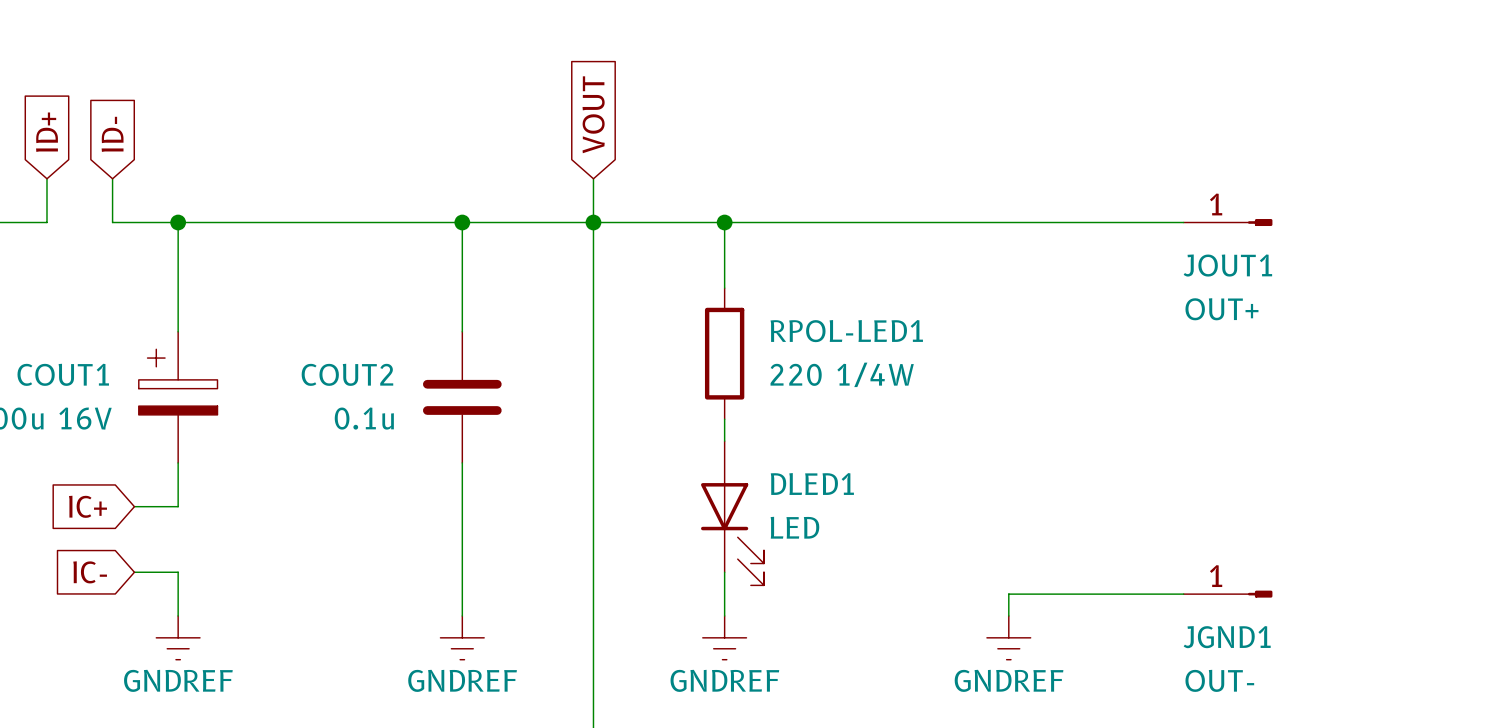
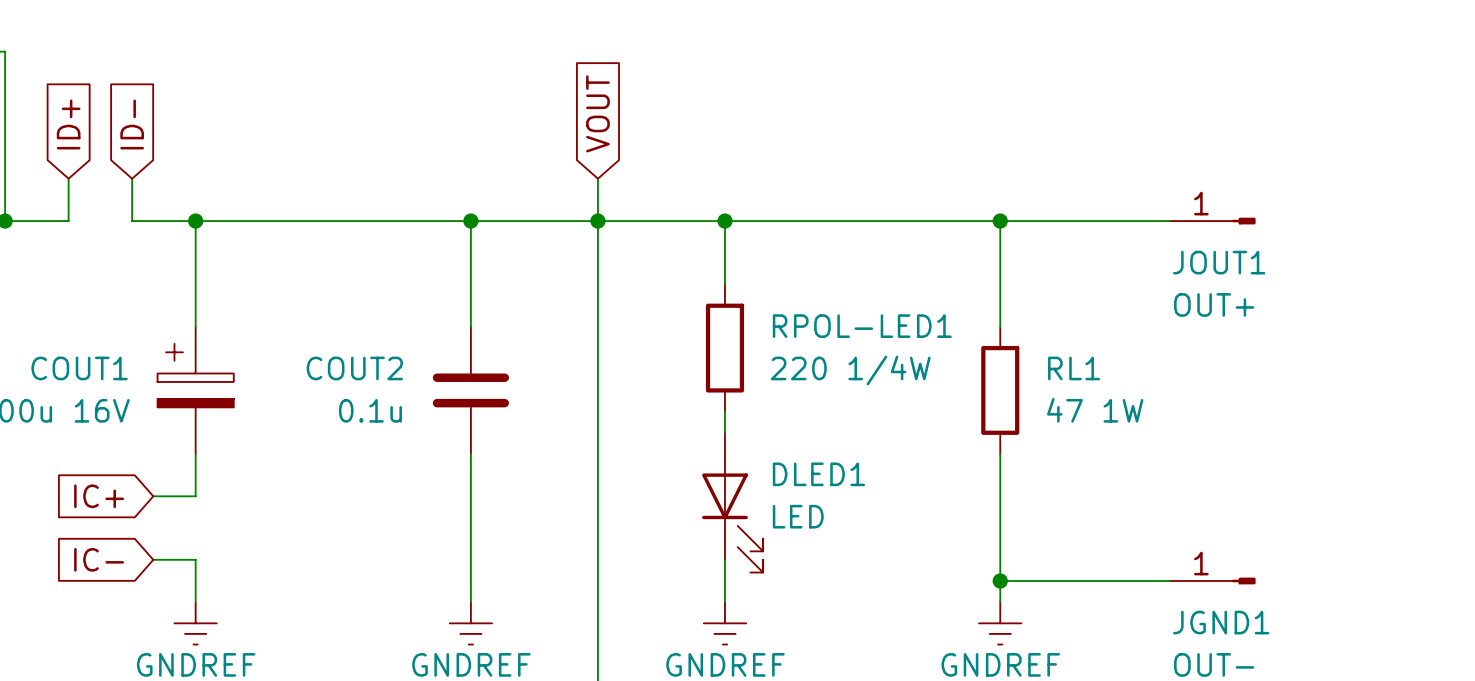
wire: none -> (1000, 221) (1000, 326)
junction: none -> (1000, 221)
RL1: none -> 47 1W (1000, 390)
wire: none -> (1000, 453) (1000, 580)
junction: none -> (1000, 580)

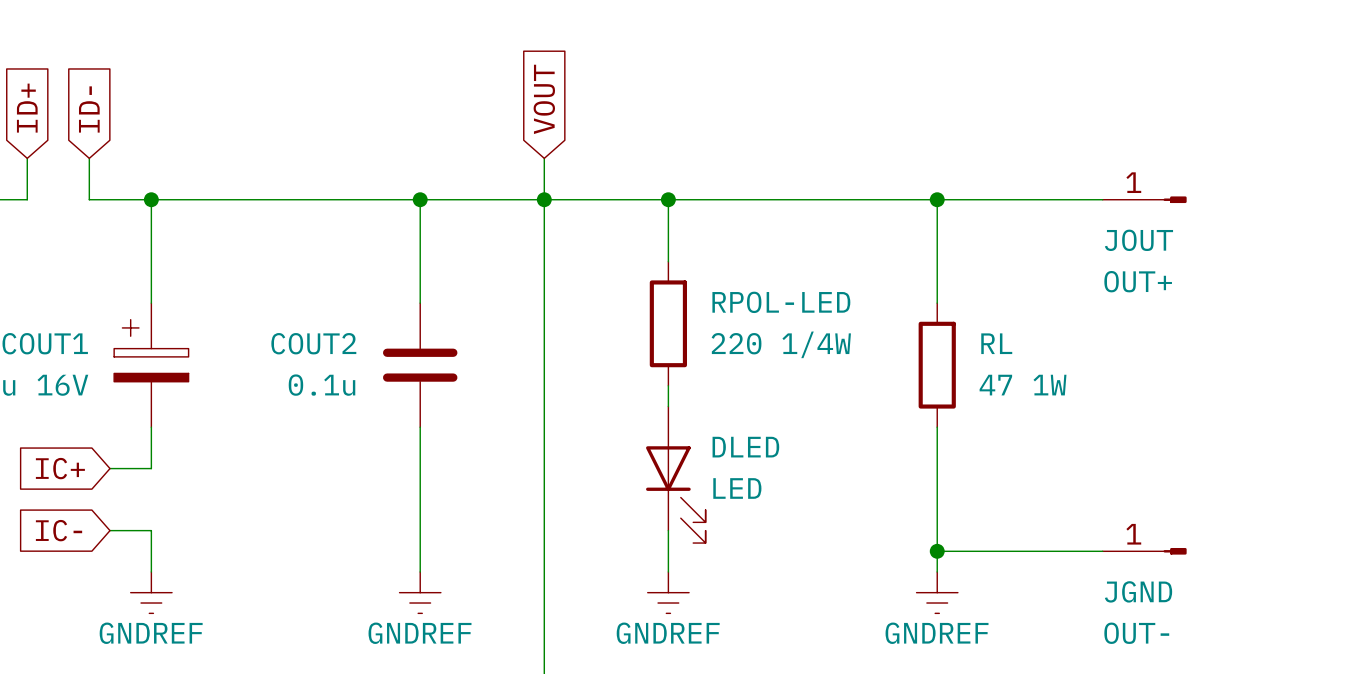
JOUT1 name: JOUT1 (1219, 262) -> JOUT (1138, 240)
RPOL-LED1 name: RPOL-LED1 (862, 326) -> RPOL-LED (781, 302)
RL1 name: RL1 (1074, 368) -> RL (996, 343)
DLED1 name: DLED1 (818, 474) -> DLED (745, 447)
JGND1 name: JGND1 (1221, 622) -> JGND (1138, 591)

